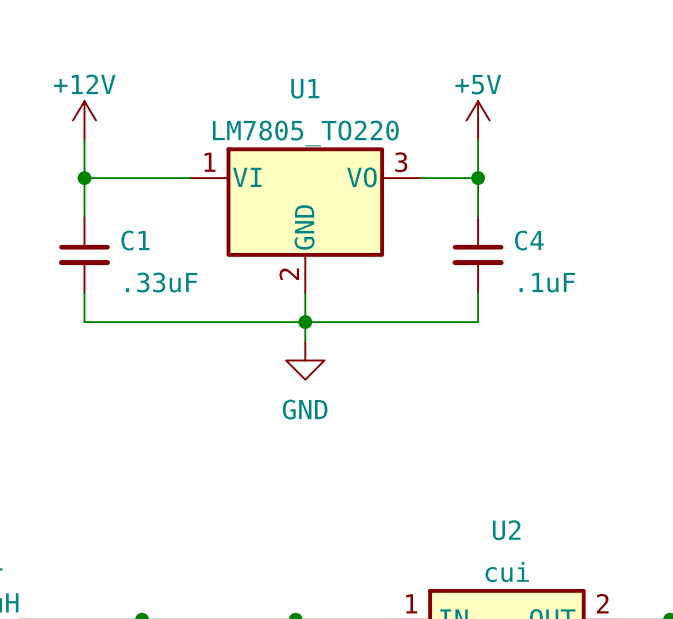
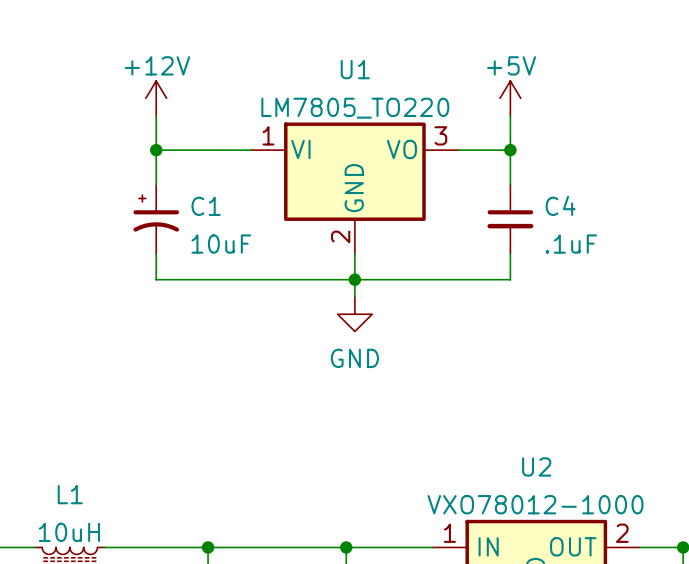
C1 symbol: [58, 216, 111, 294] -> [133, 184, 180, 254]
C1 value: .33uF (161, 282) -> 10uF (221, 244)
U2 value: cui (507, 571) -> VXO78012-1000 (535, 504)

